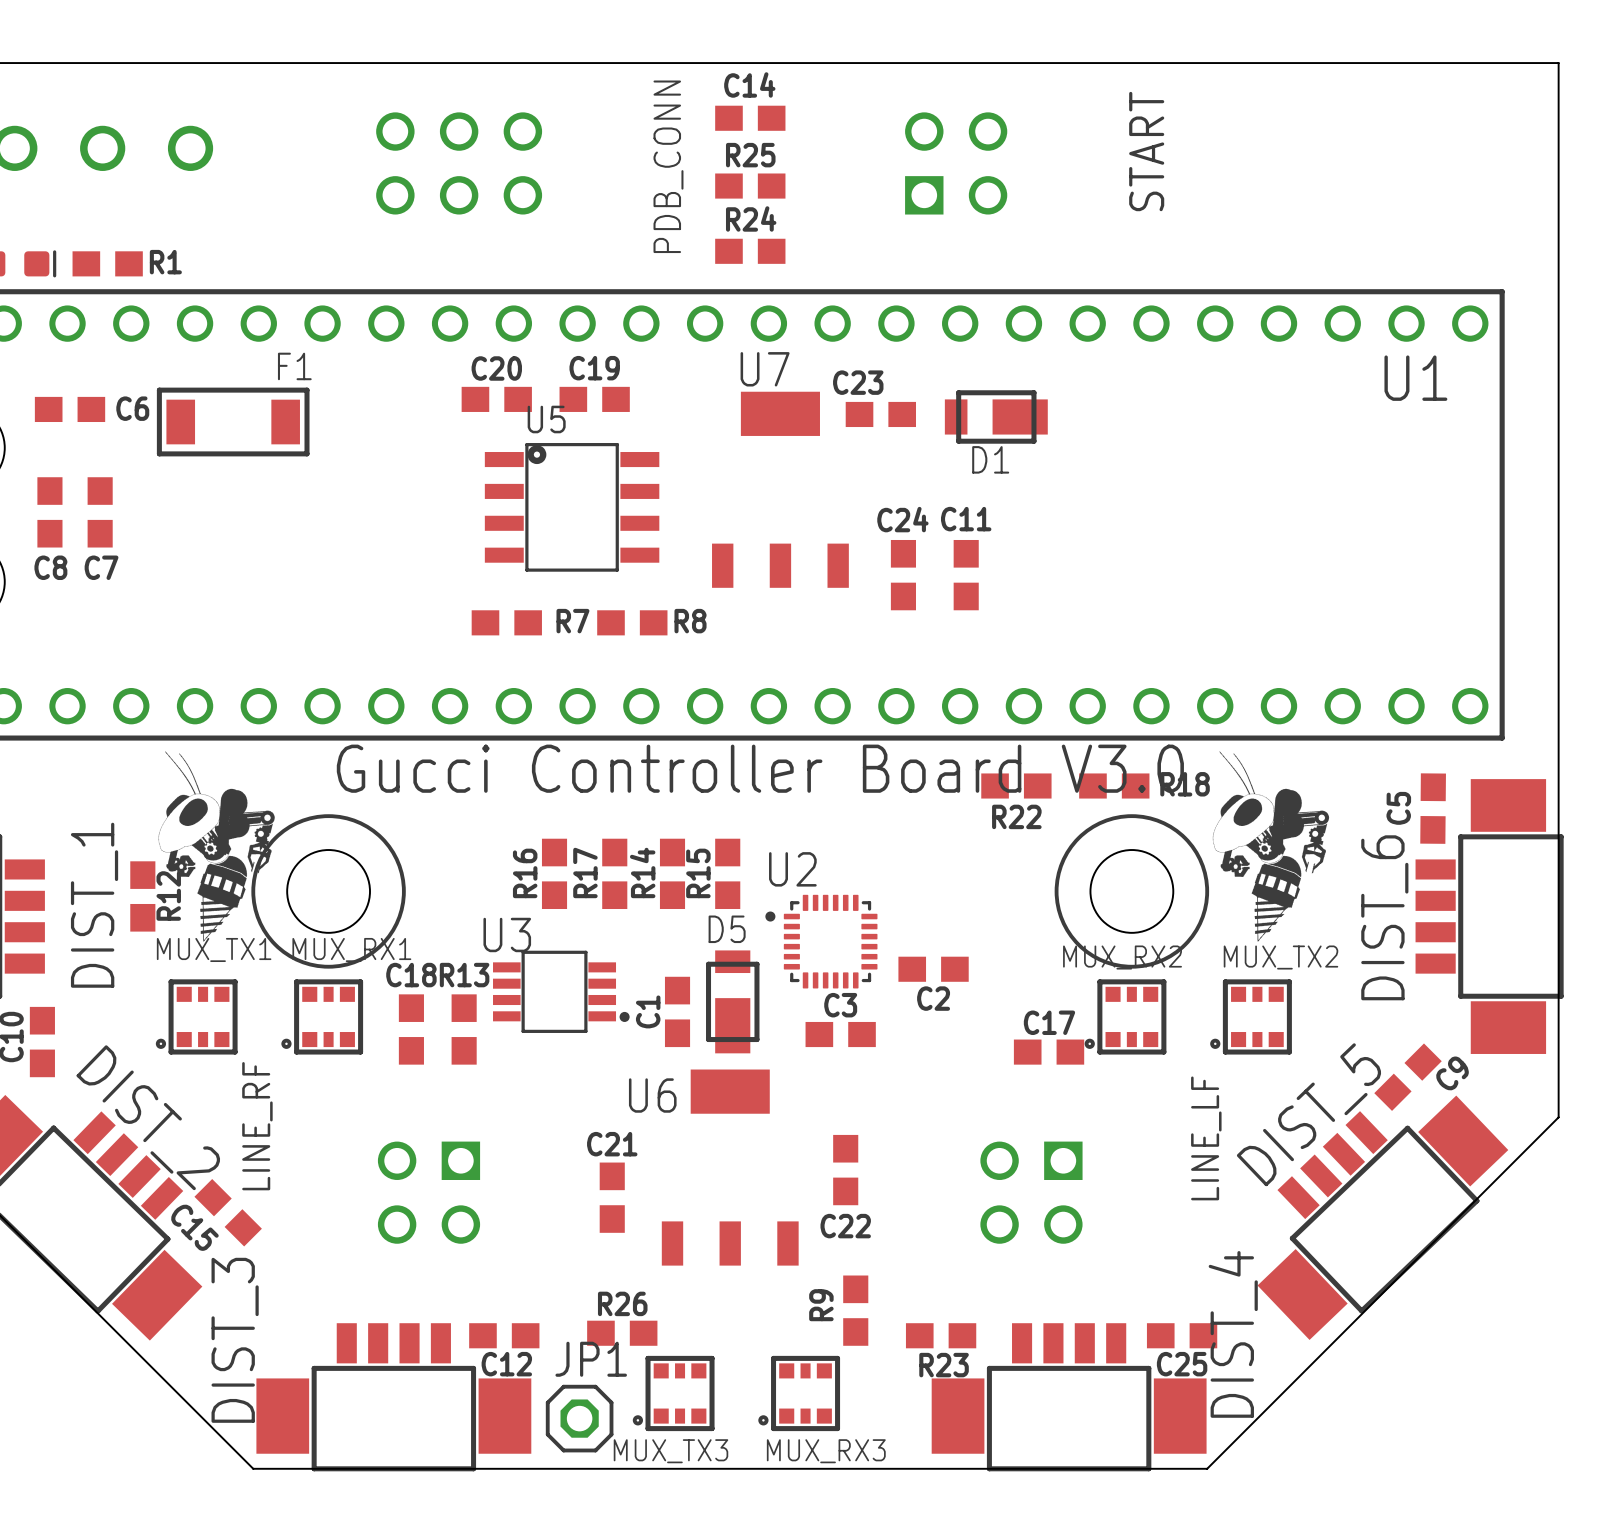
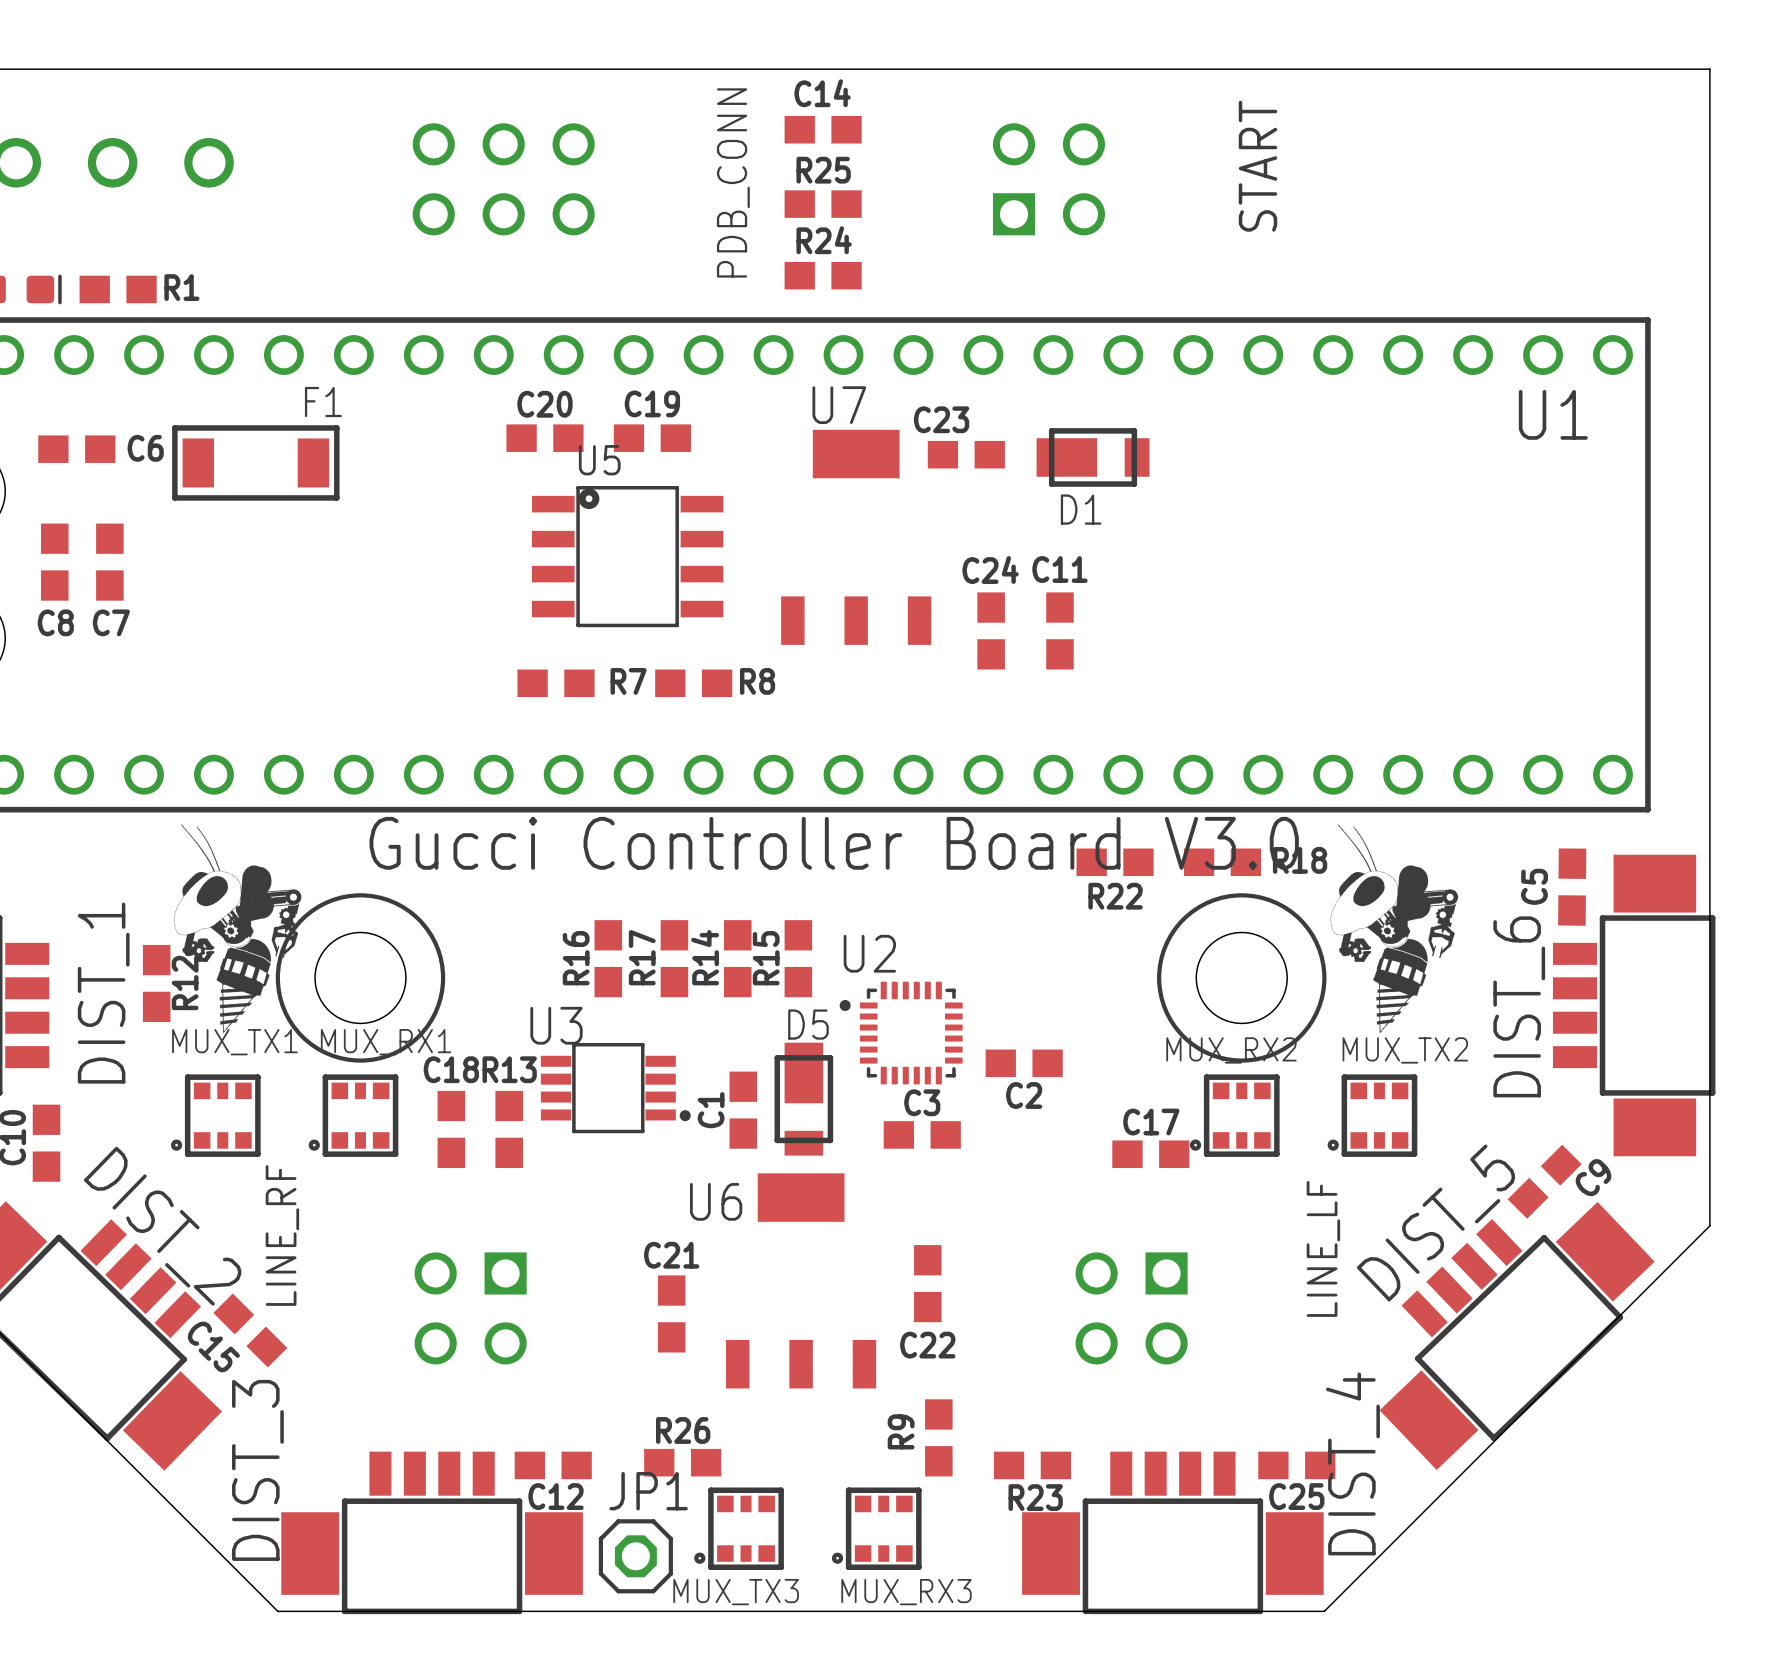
D1 rotation: 0° (996, 416) -> 180° (1093, 457)
D5 rotation: 0° (732, 1001) -> 180° (803, 1099)

